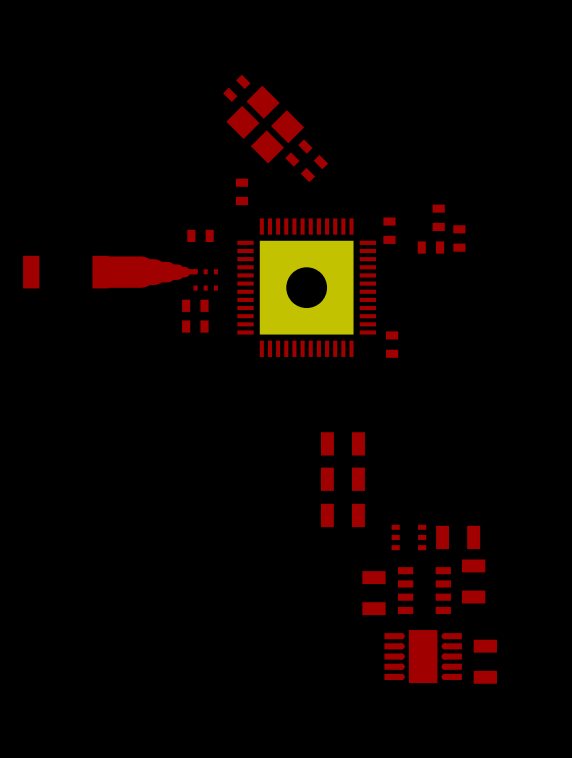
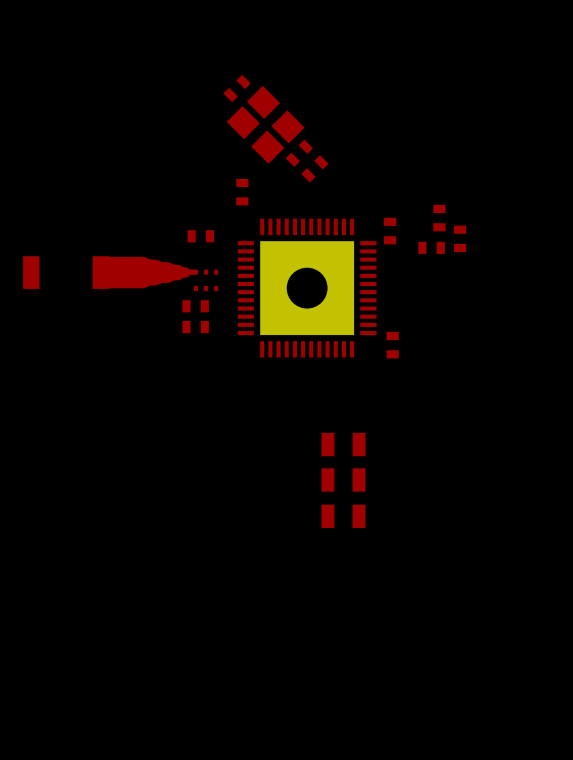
part: (408, 537) -> none
part: (458, 537) -> none
part: (473, 581) -> none
part: (424, 590) -> none
part: (373, 593) -> none
part: (423, 656) -> none
part: (485, 661) -> none

